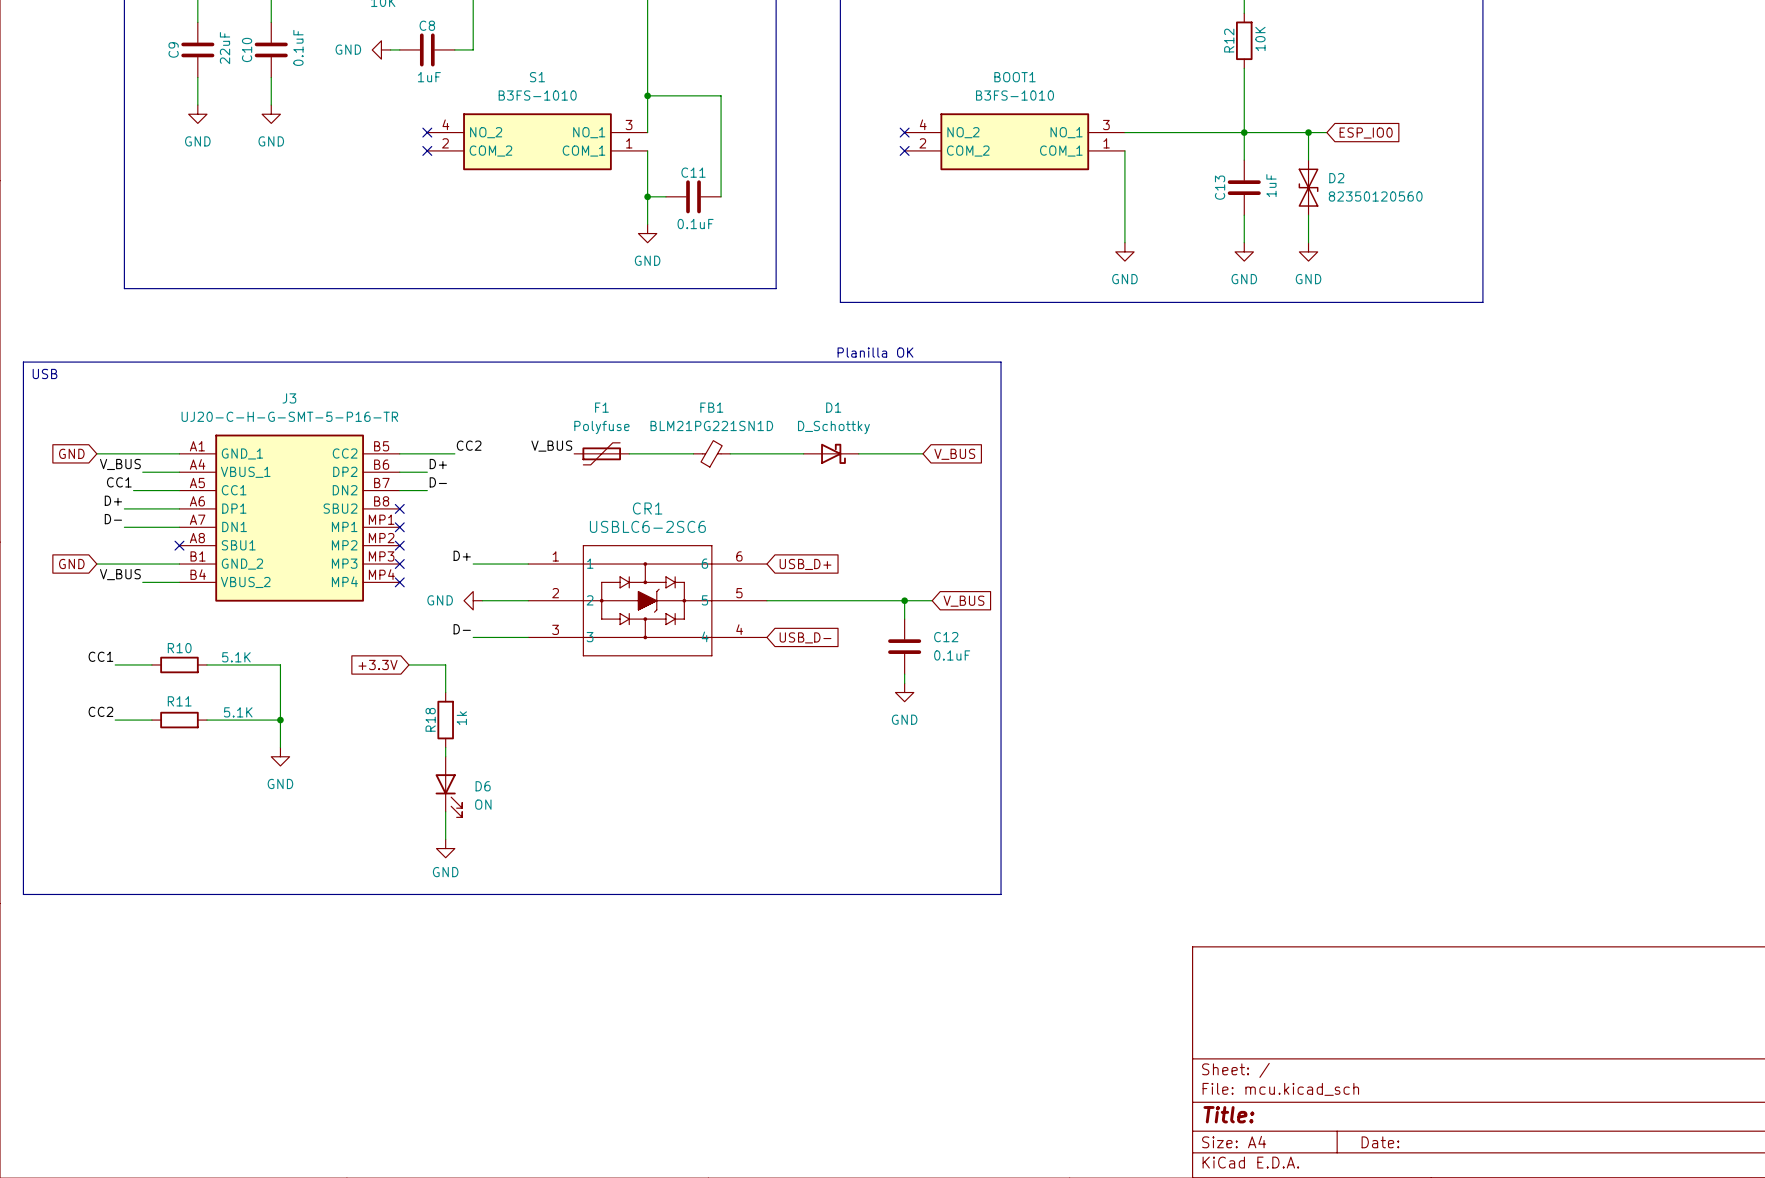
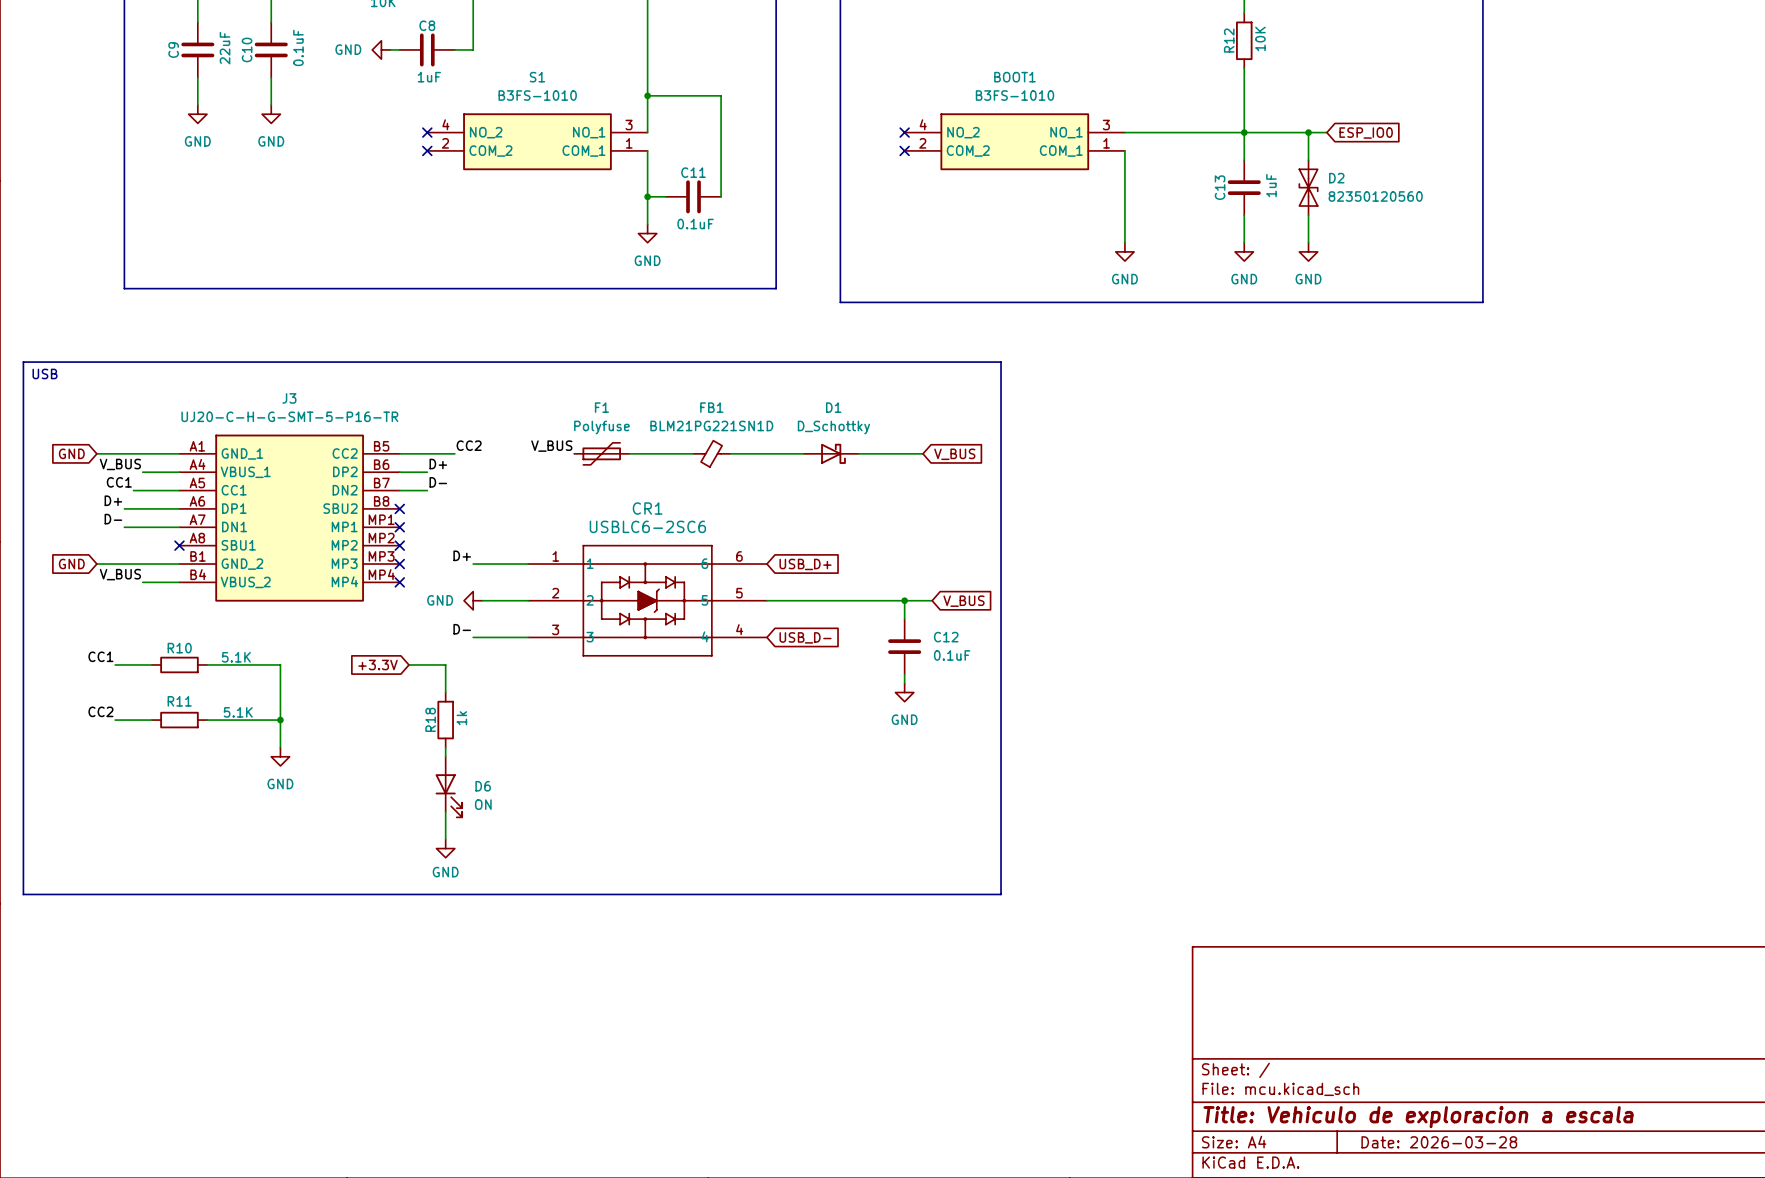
text: Planilla OK (875, 352) -> none
title block: Title: (1228, 1114) -> Title: Vehiculo de exploracion a escala (1418, 1117)
title block: Date: (1380, 1142) -> Date: 2026-03-28 (1439, 1142)

